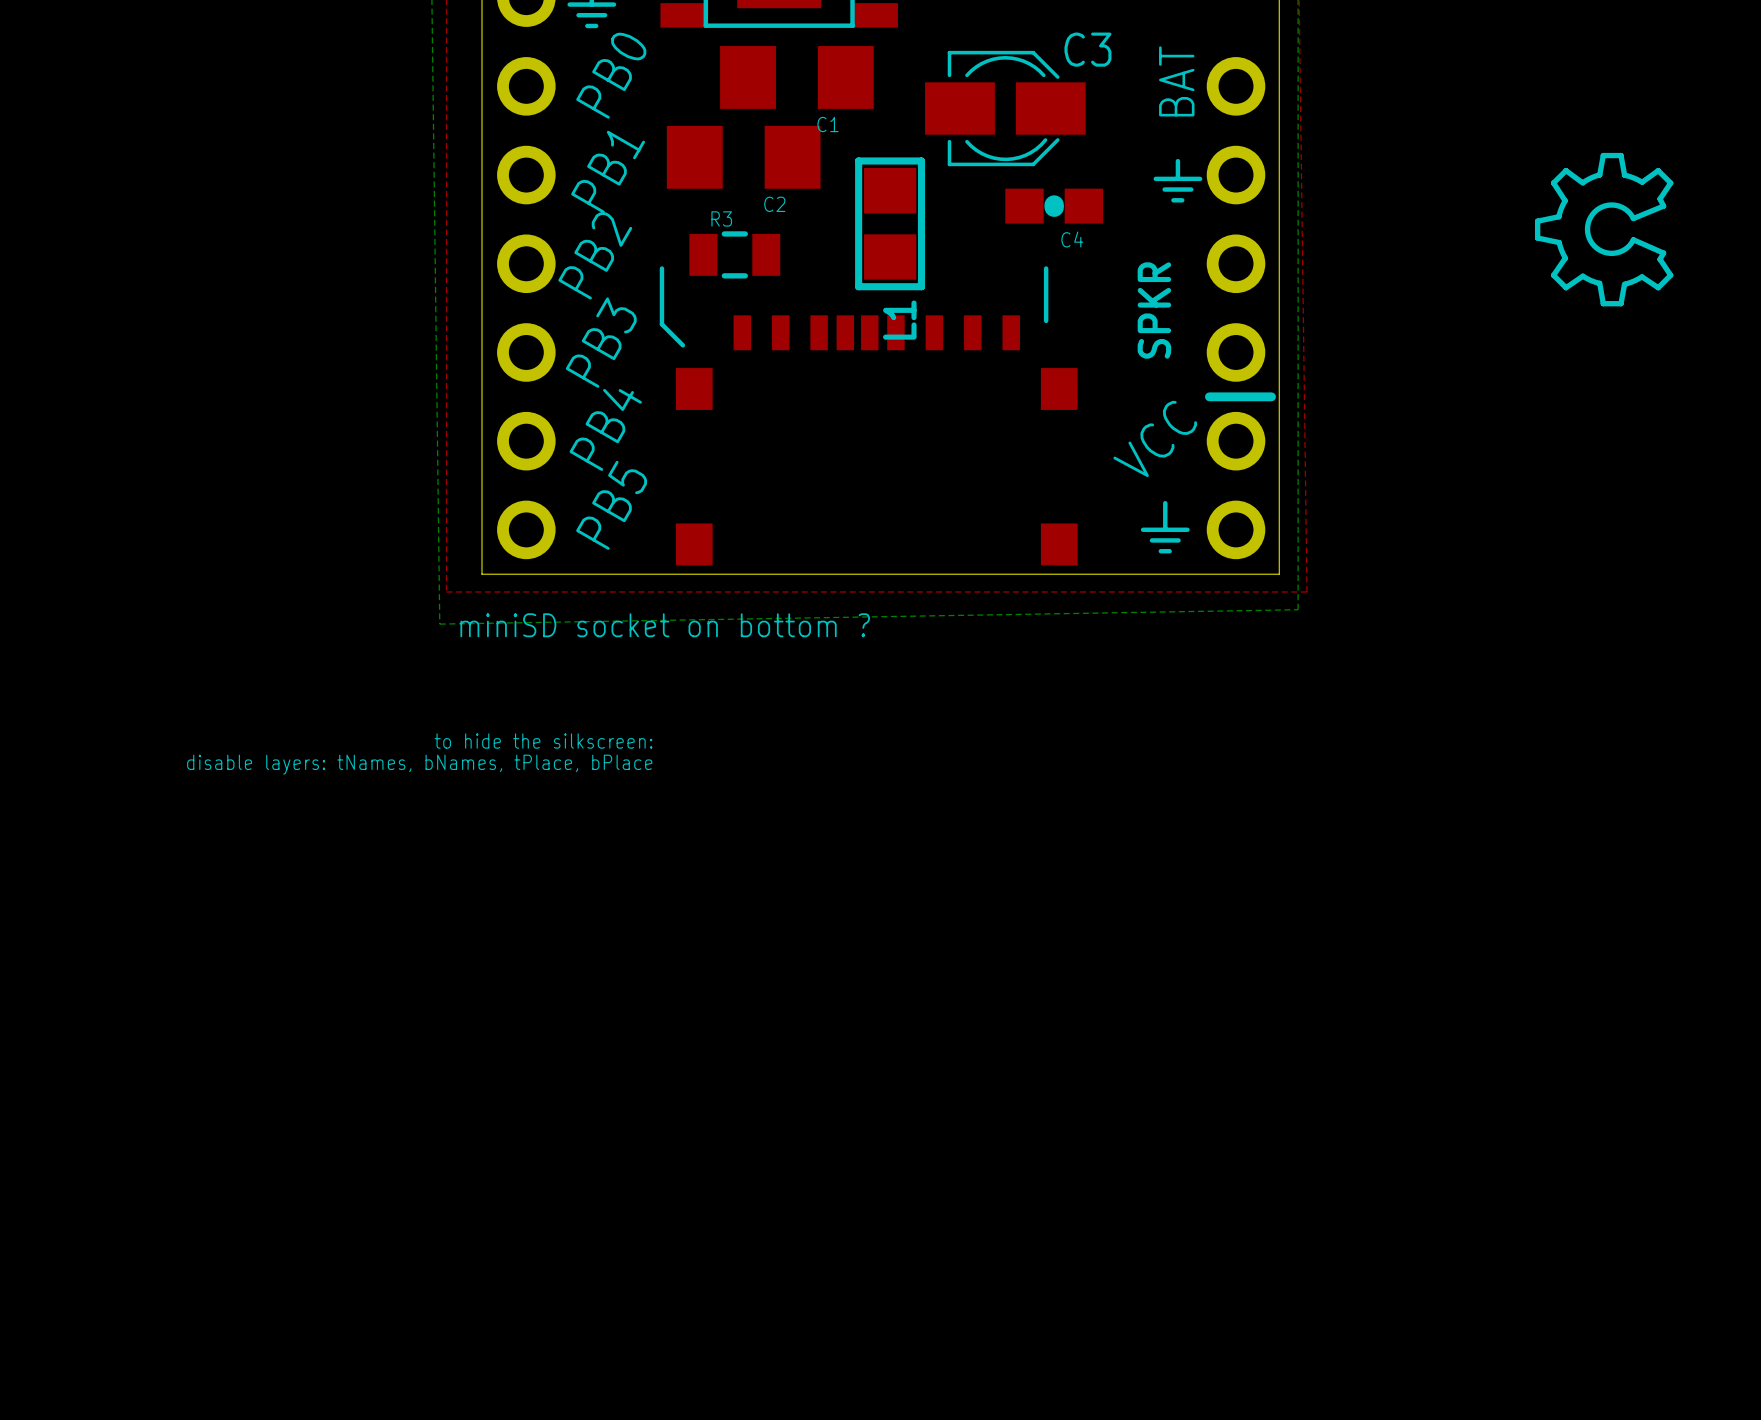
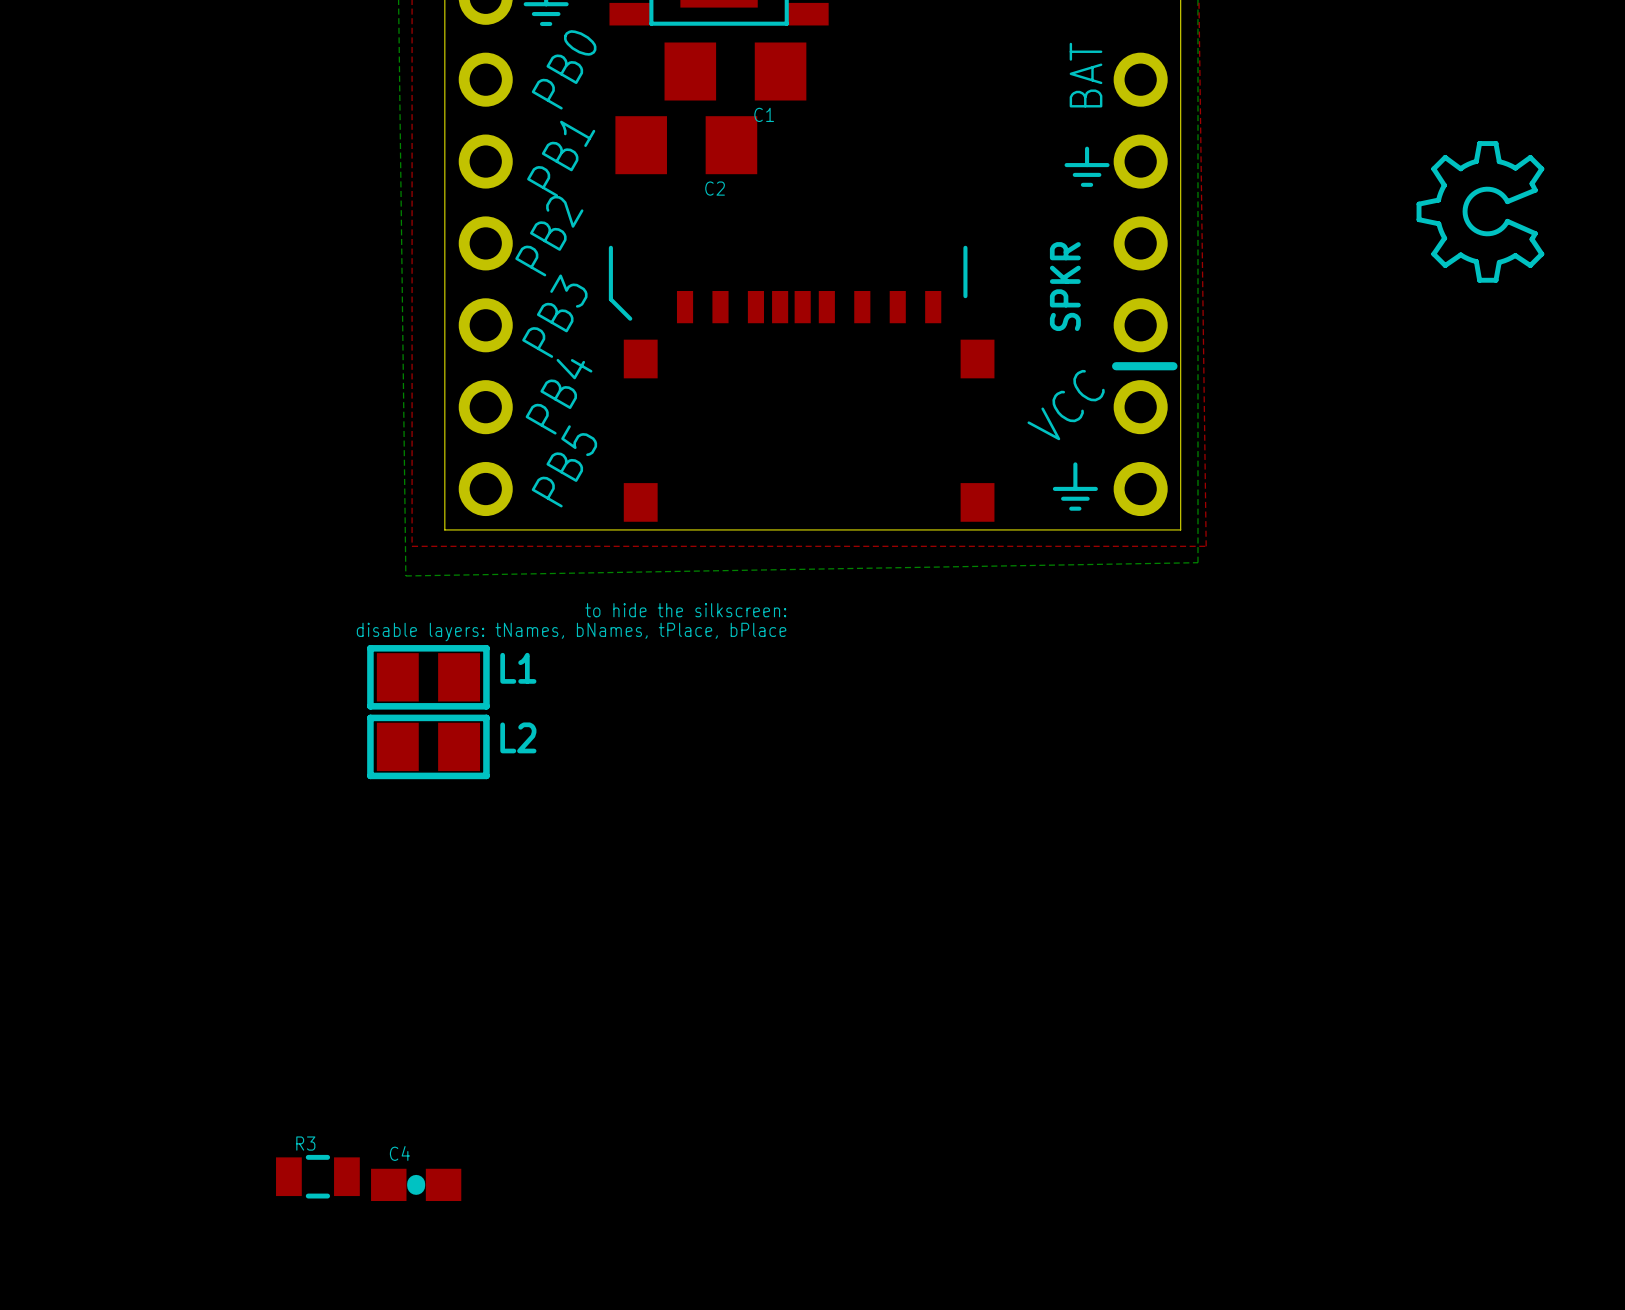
C3: (1005, 108) -> none
C4 position: (1054, 206) -> (416, 1184)
L1 rotation: 0° (890, 223) -> 90° clockwise (428, 677)
L1 position: (890, 223) -> (428, 677)
C4 name position: C4 (1072, 239) -> C4 (399, 1153)
R3 position: (734, 254) -> (317, 1176)
L1 name position: L1 (899, 320) -> L1 (518, 668)
text: miniSD socket on bottom ? (665, 625) -> none
text position: to hide the silkscreen: (543, 741) -> to hide the silkscreen: (685, 610)
text position: disable layers: tNames, bNames, tPlace, bPlace (419, 764) -> disable layers: tNames, bNames, tPlace, bPlace (571, 632)
L2: none -> (428, 746)

